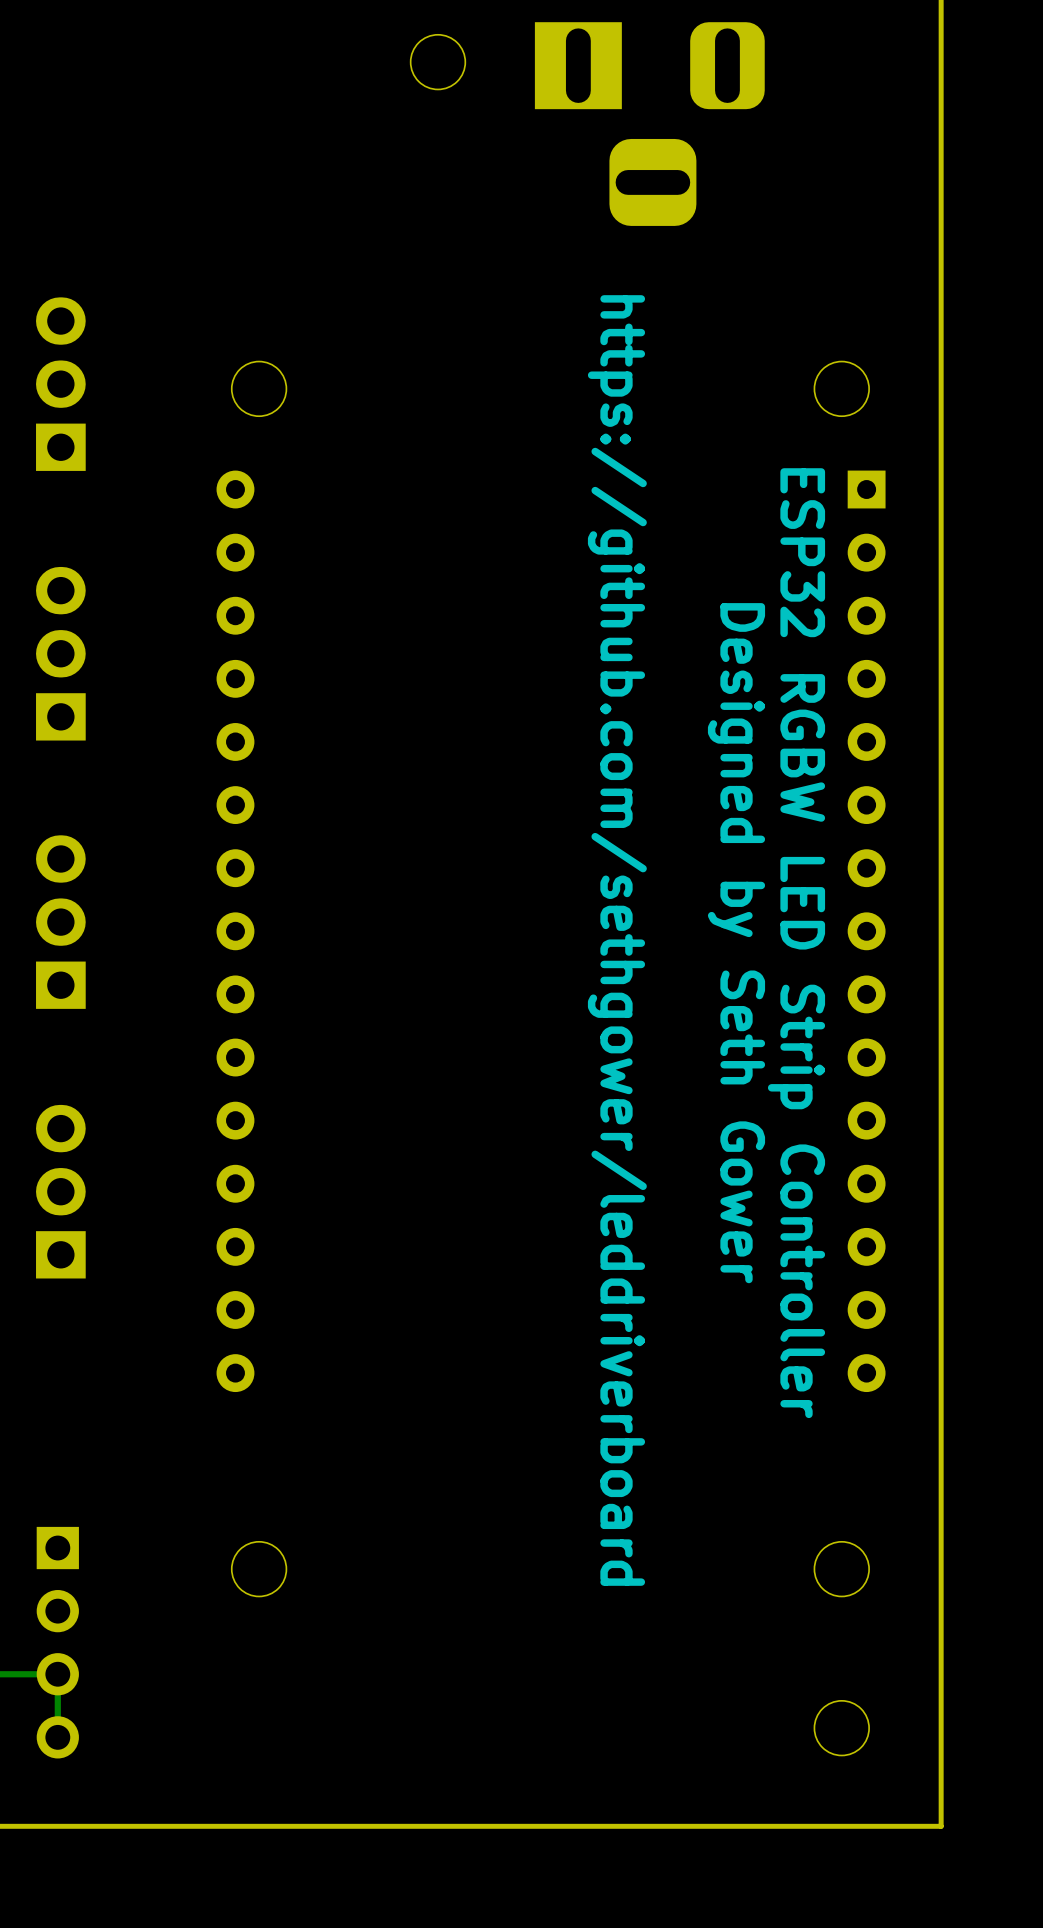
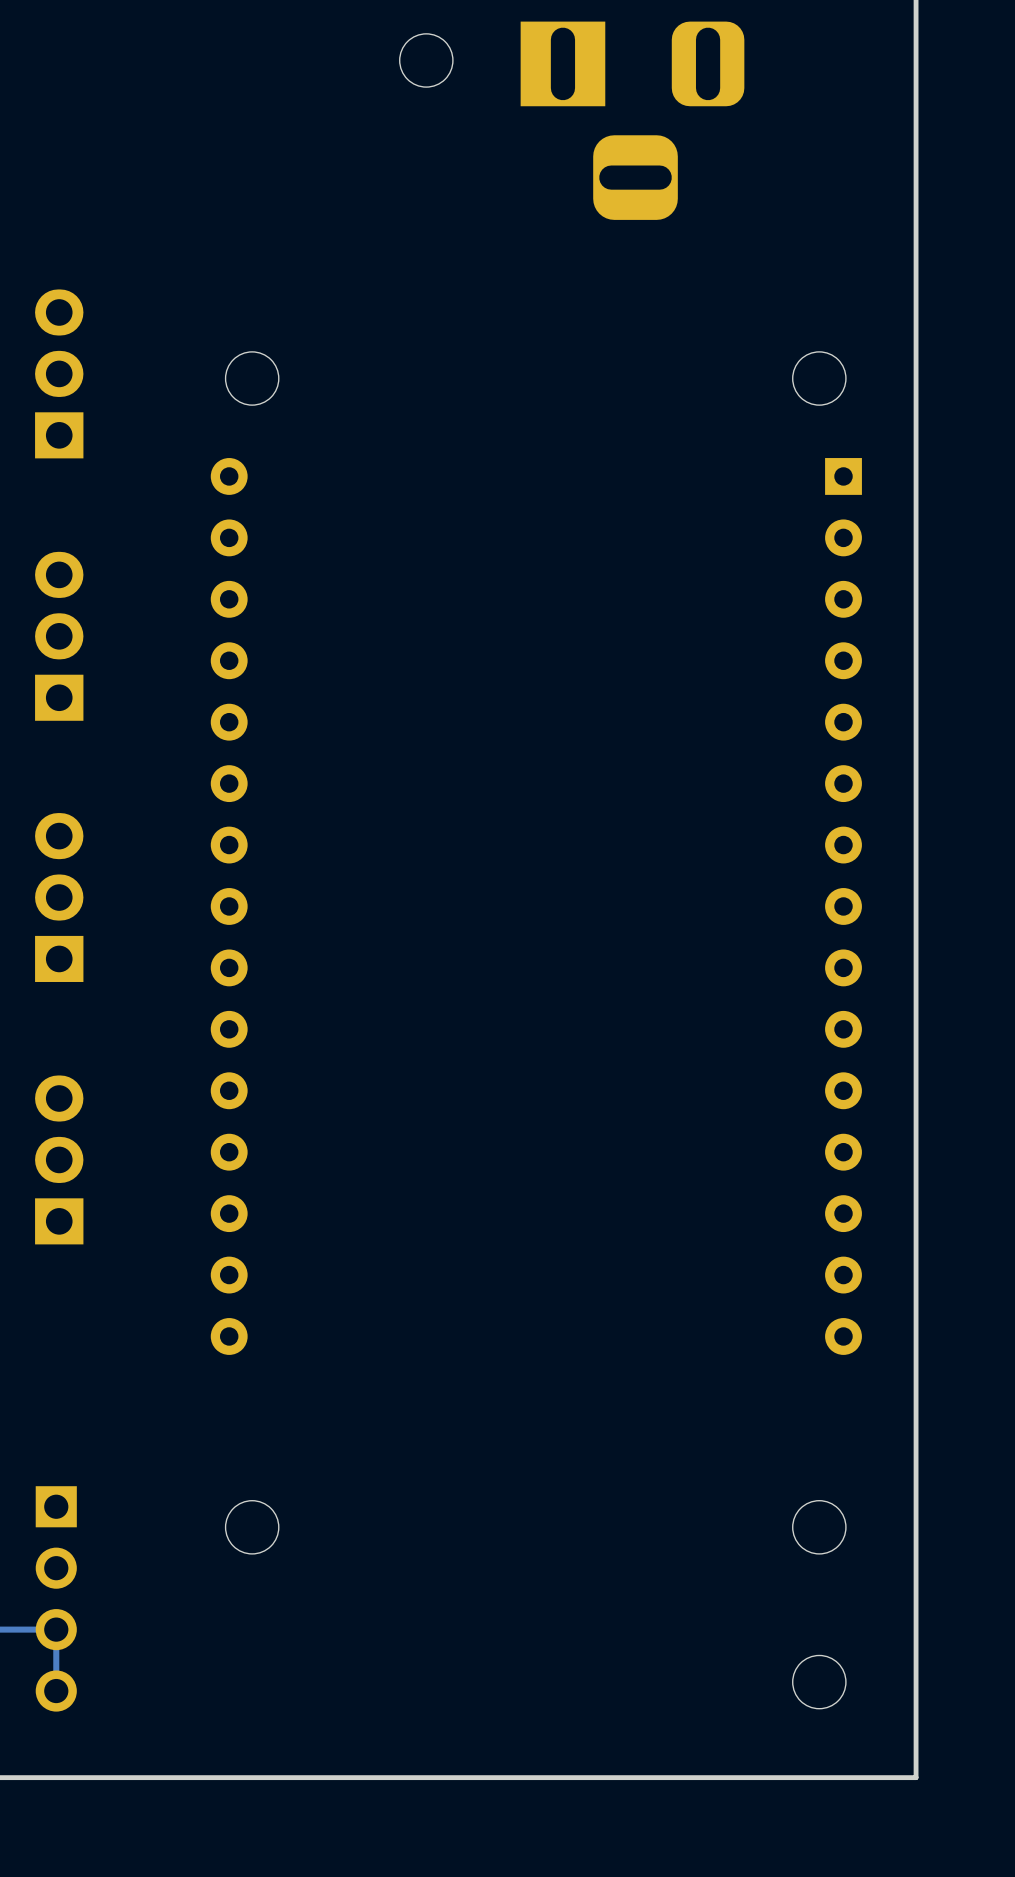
text: https://github.com/sethgower/leddriverboard (617, 940) -> none
text: Designed by Seth Gower (736, 943) -> none
text: ESP32 RGBW LED Strip Controller (796, 943) -> none

